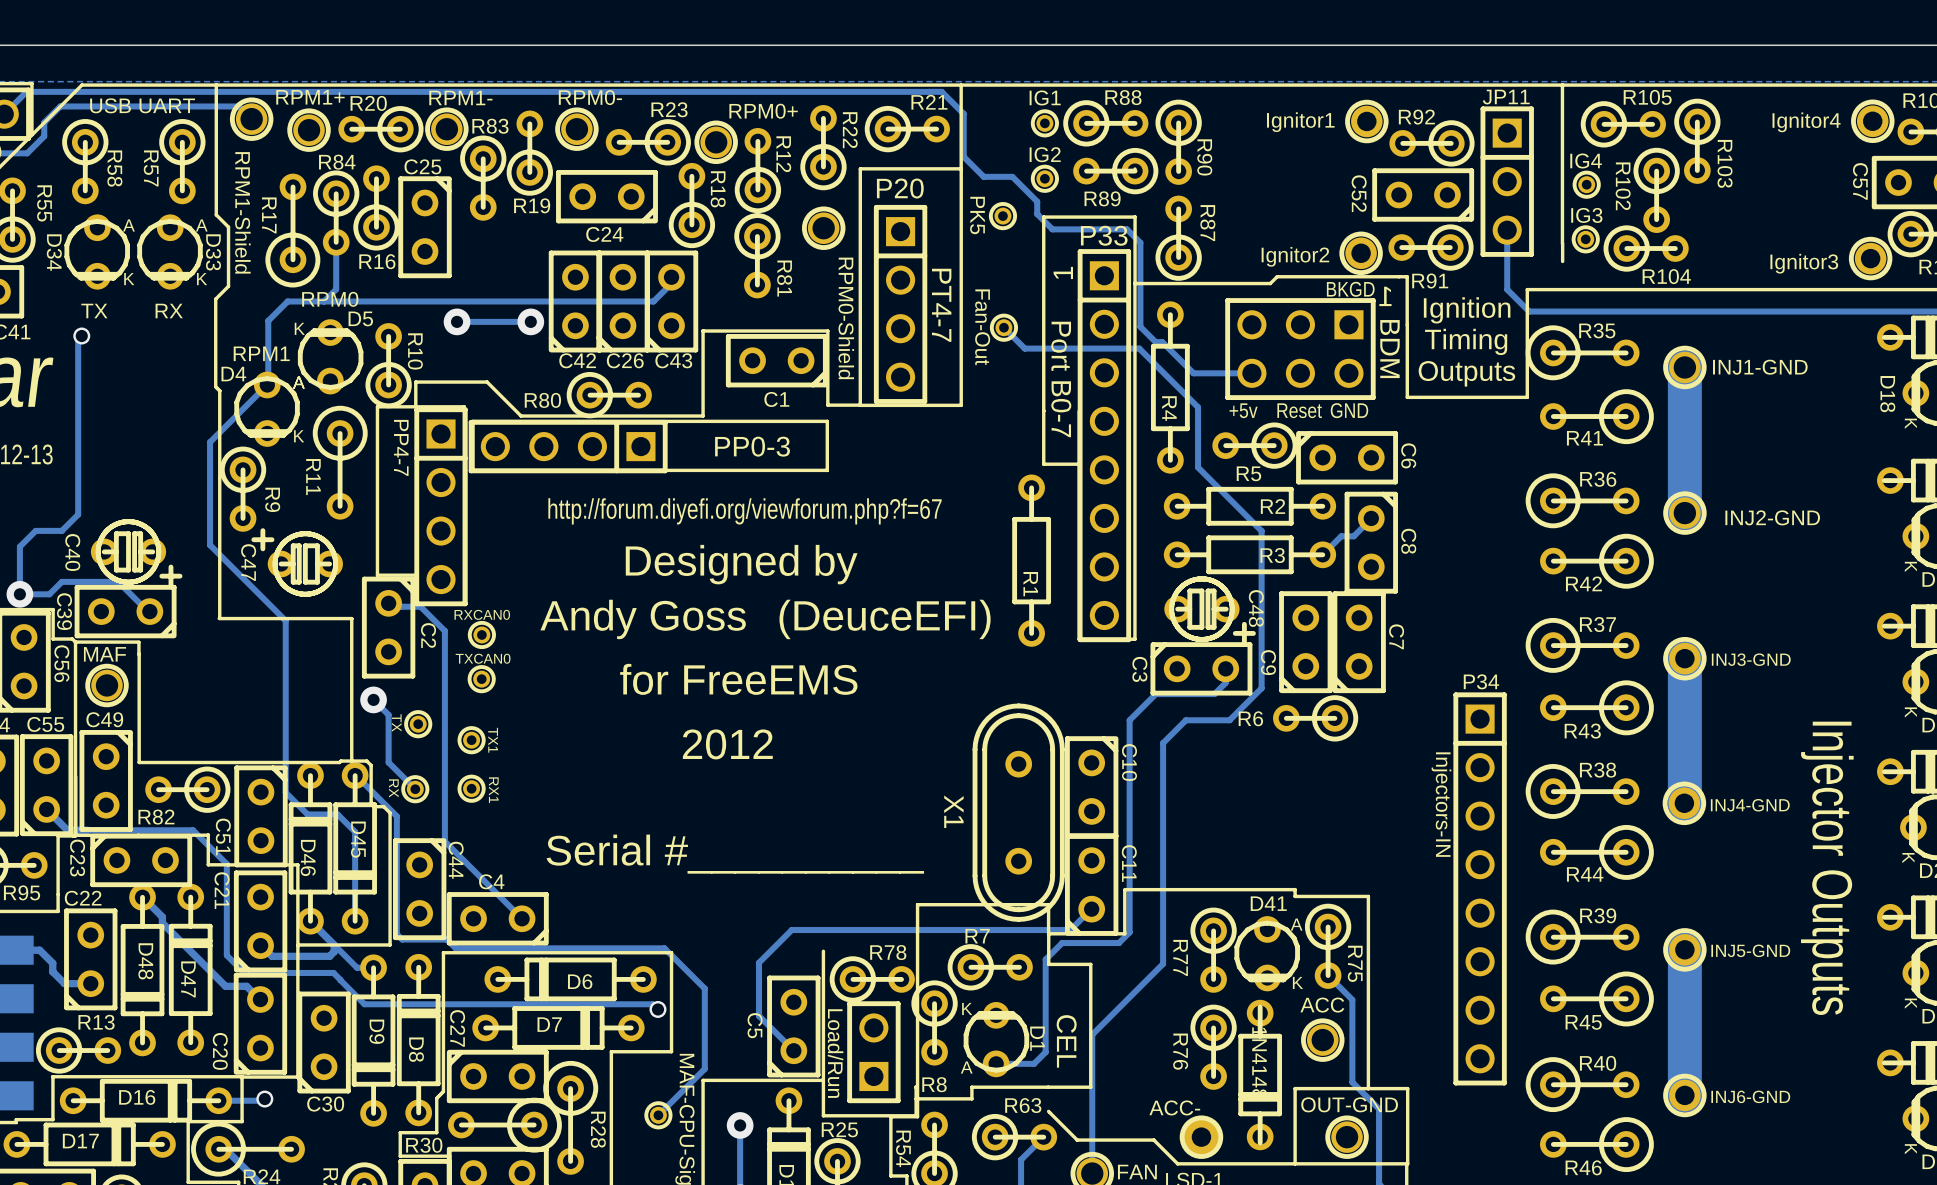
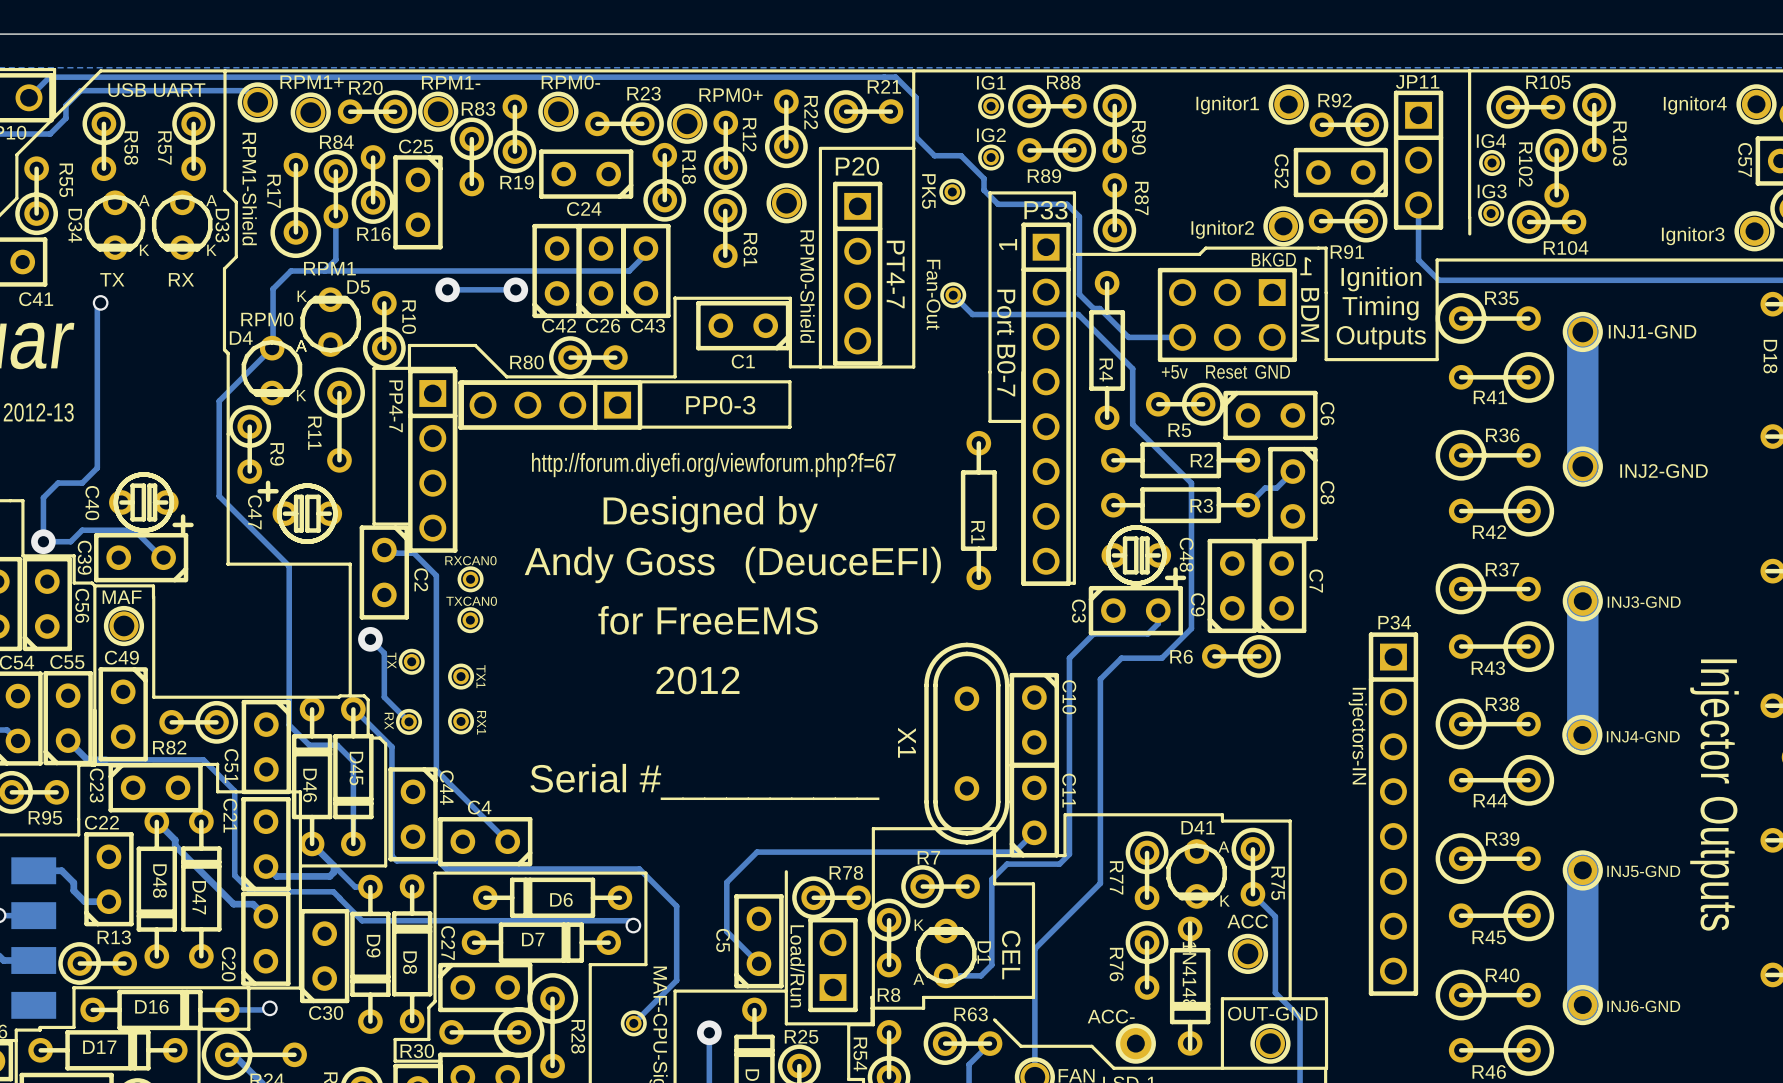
text: RPM0 (330, 299) -> RPM1 (329, 268)
text: RPM1 (261, 353) -> RPM0 (267, 319)

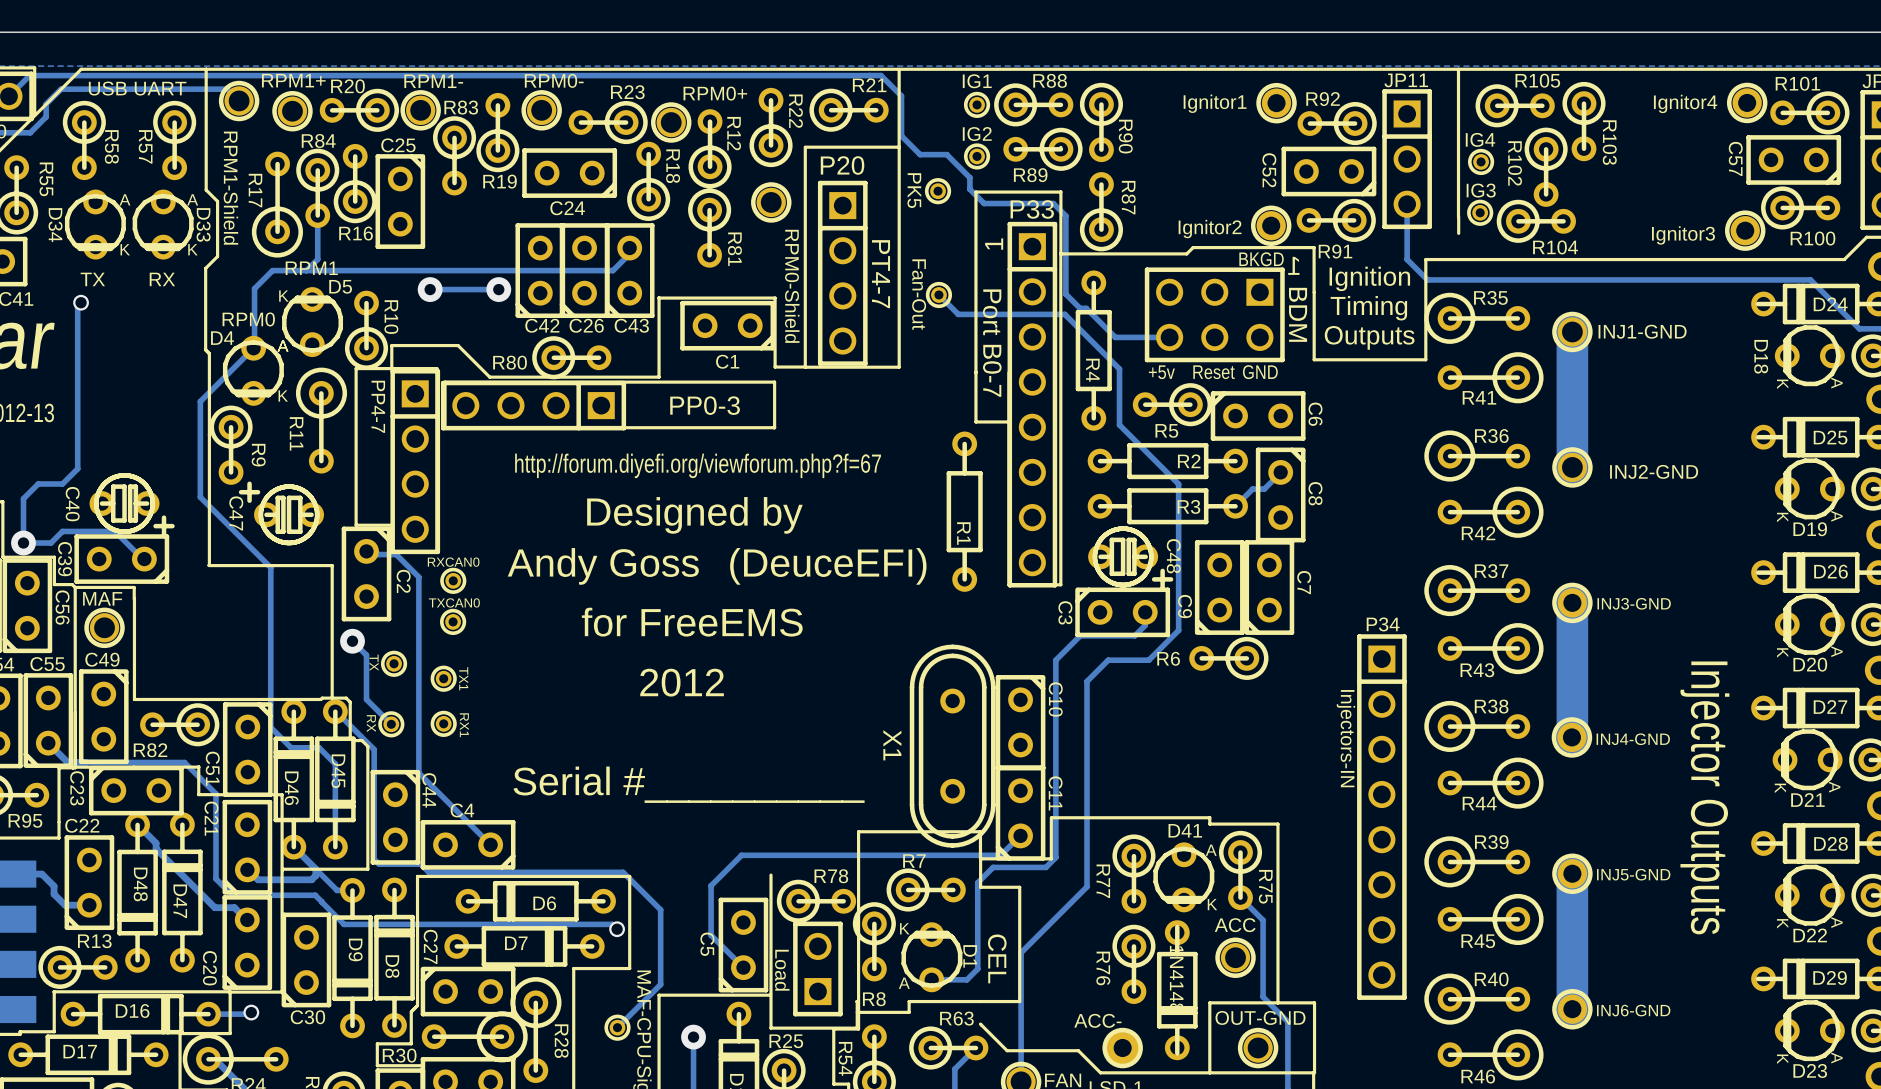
part value: Load/Run (797, 966) -> Load (782, 970)

